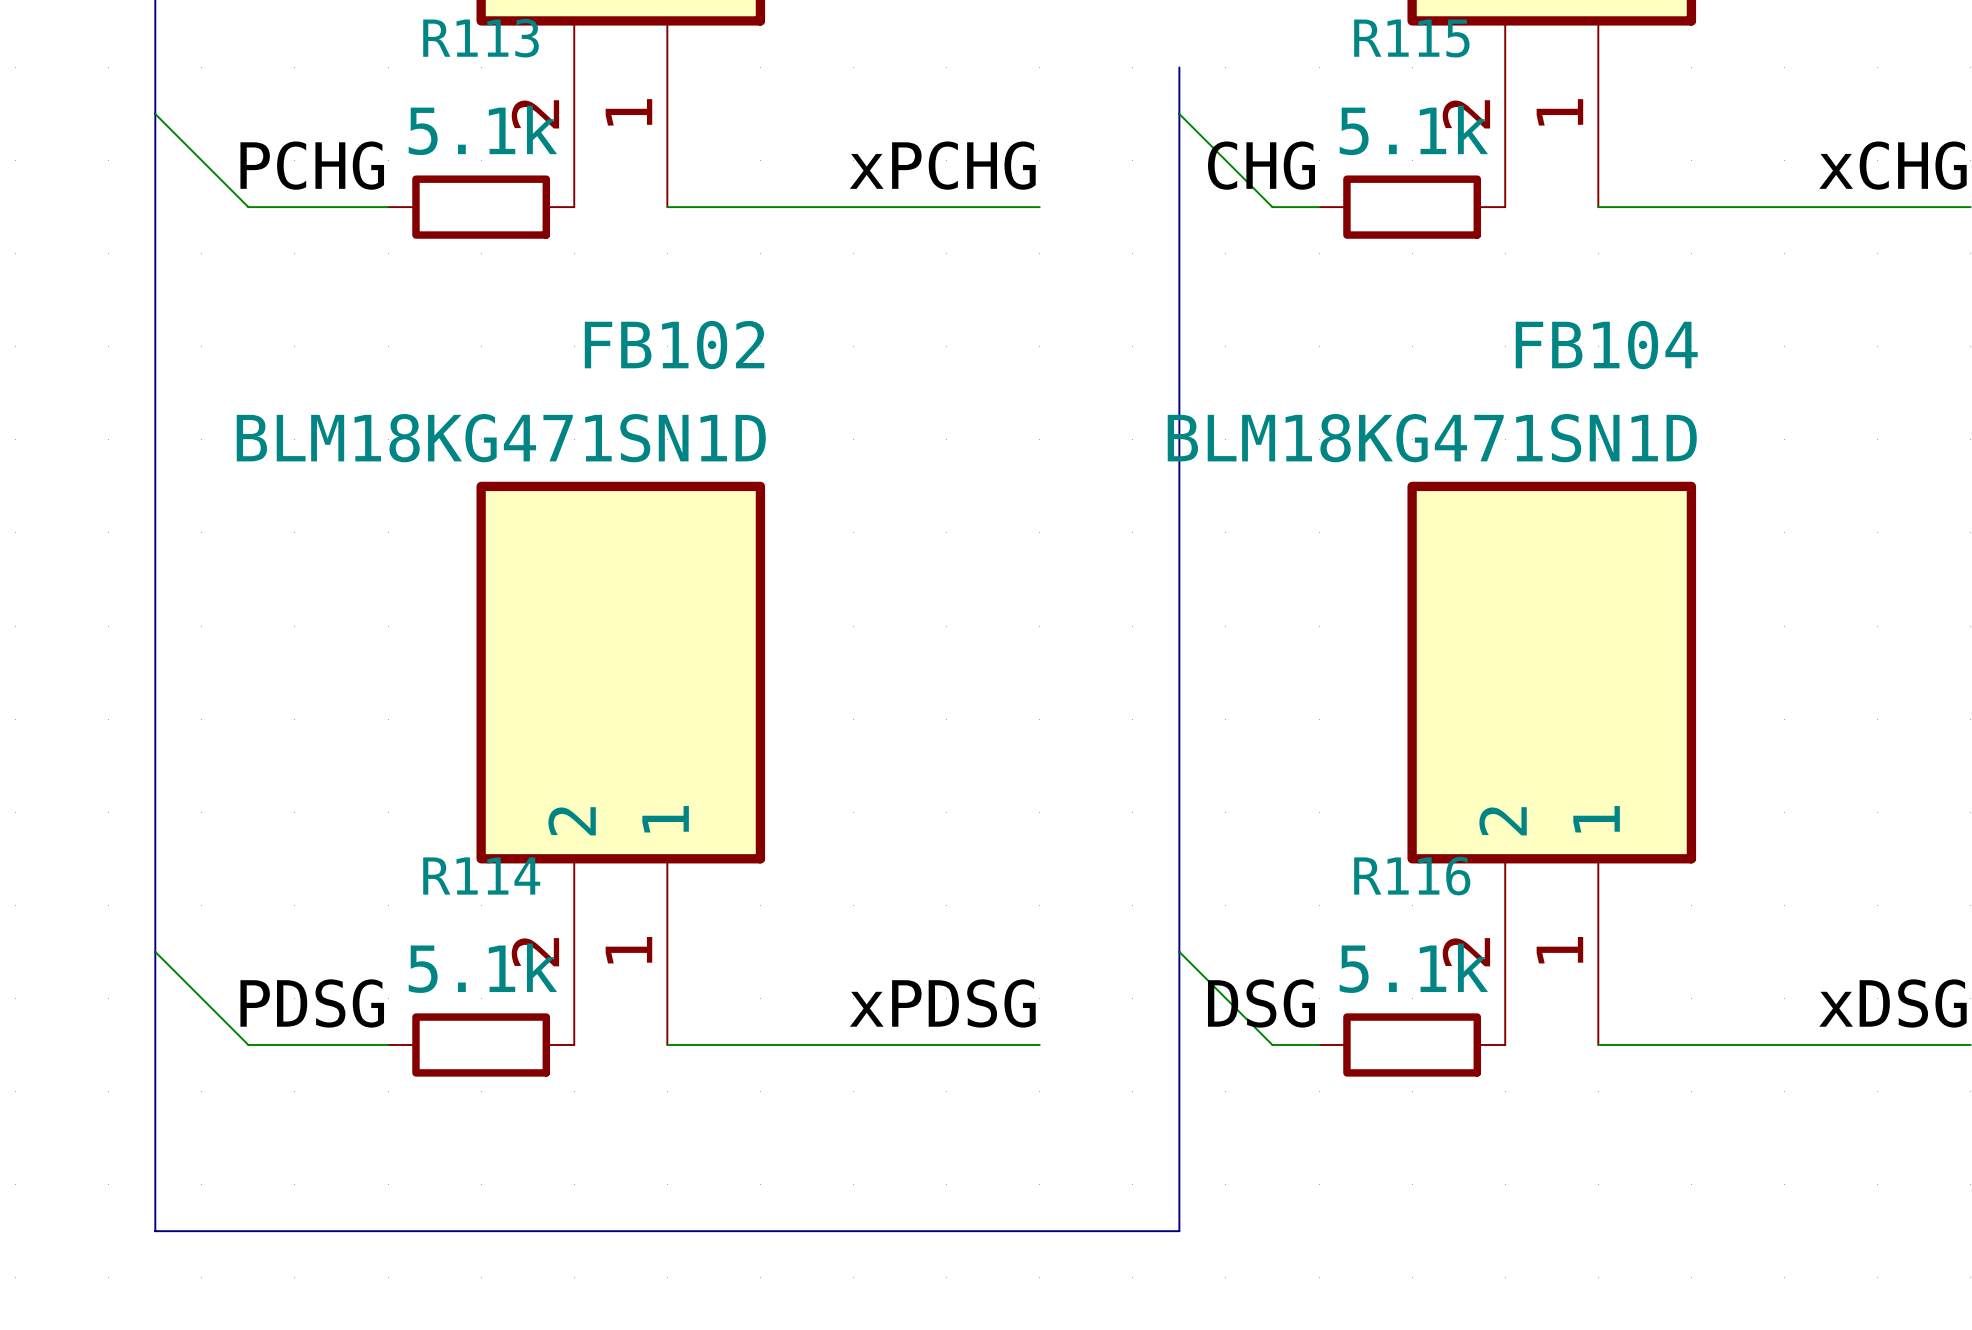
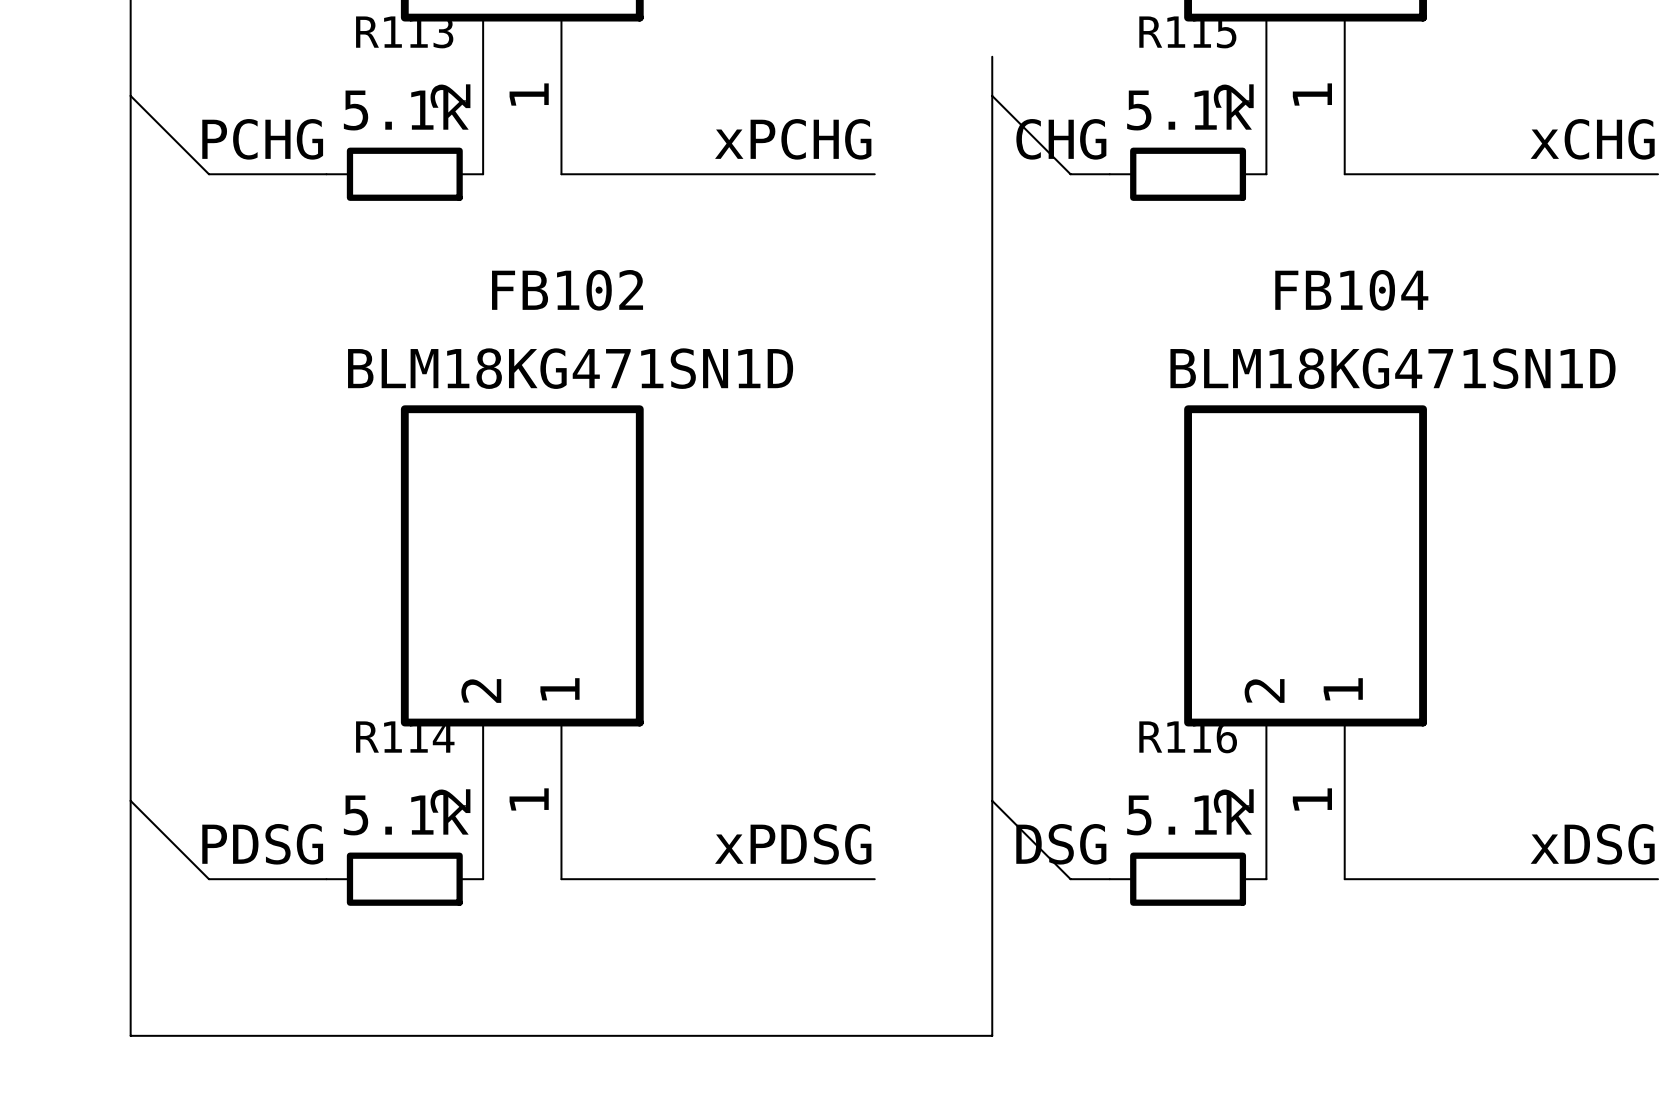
FB102 value position: BLM18KG471SN1D (501, 438) -> BLM18KG471SN1D (570, 368)
FB104 value position: BLM18KG471SN1D (1432, 438) -> BLM18KG471SN1D (1392, 368)

